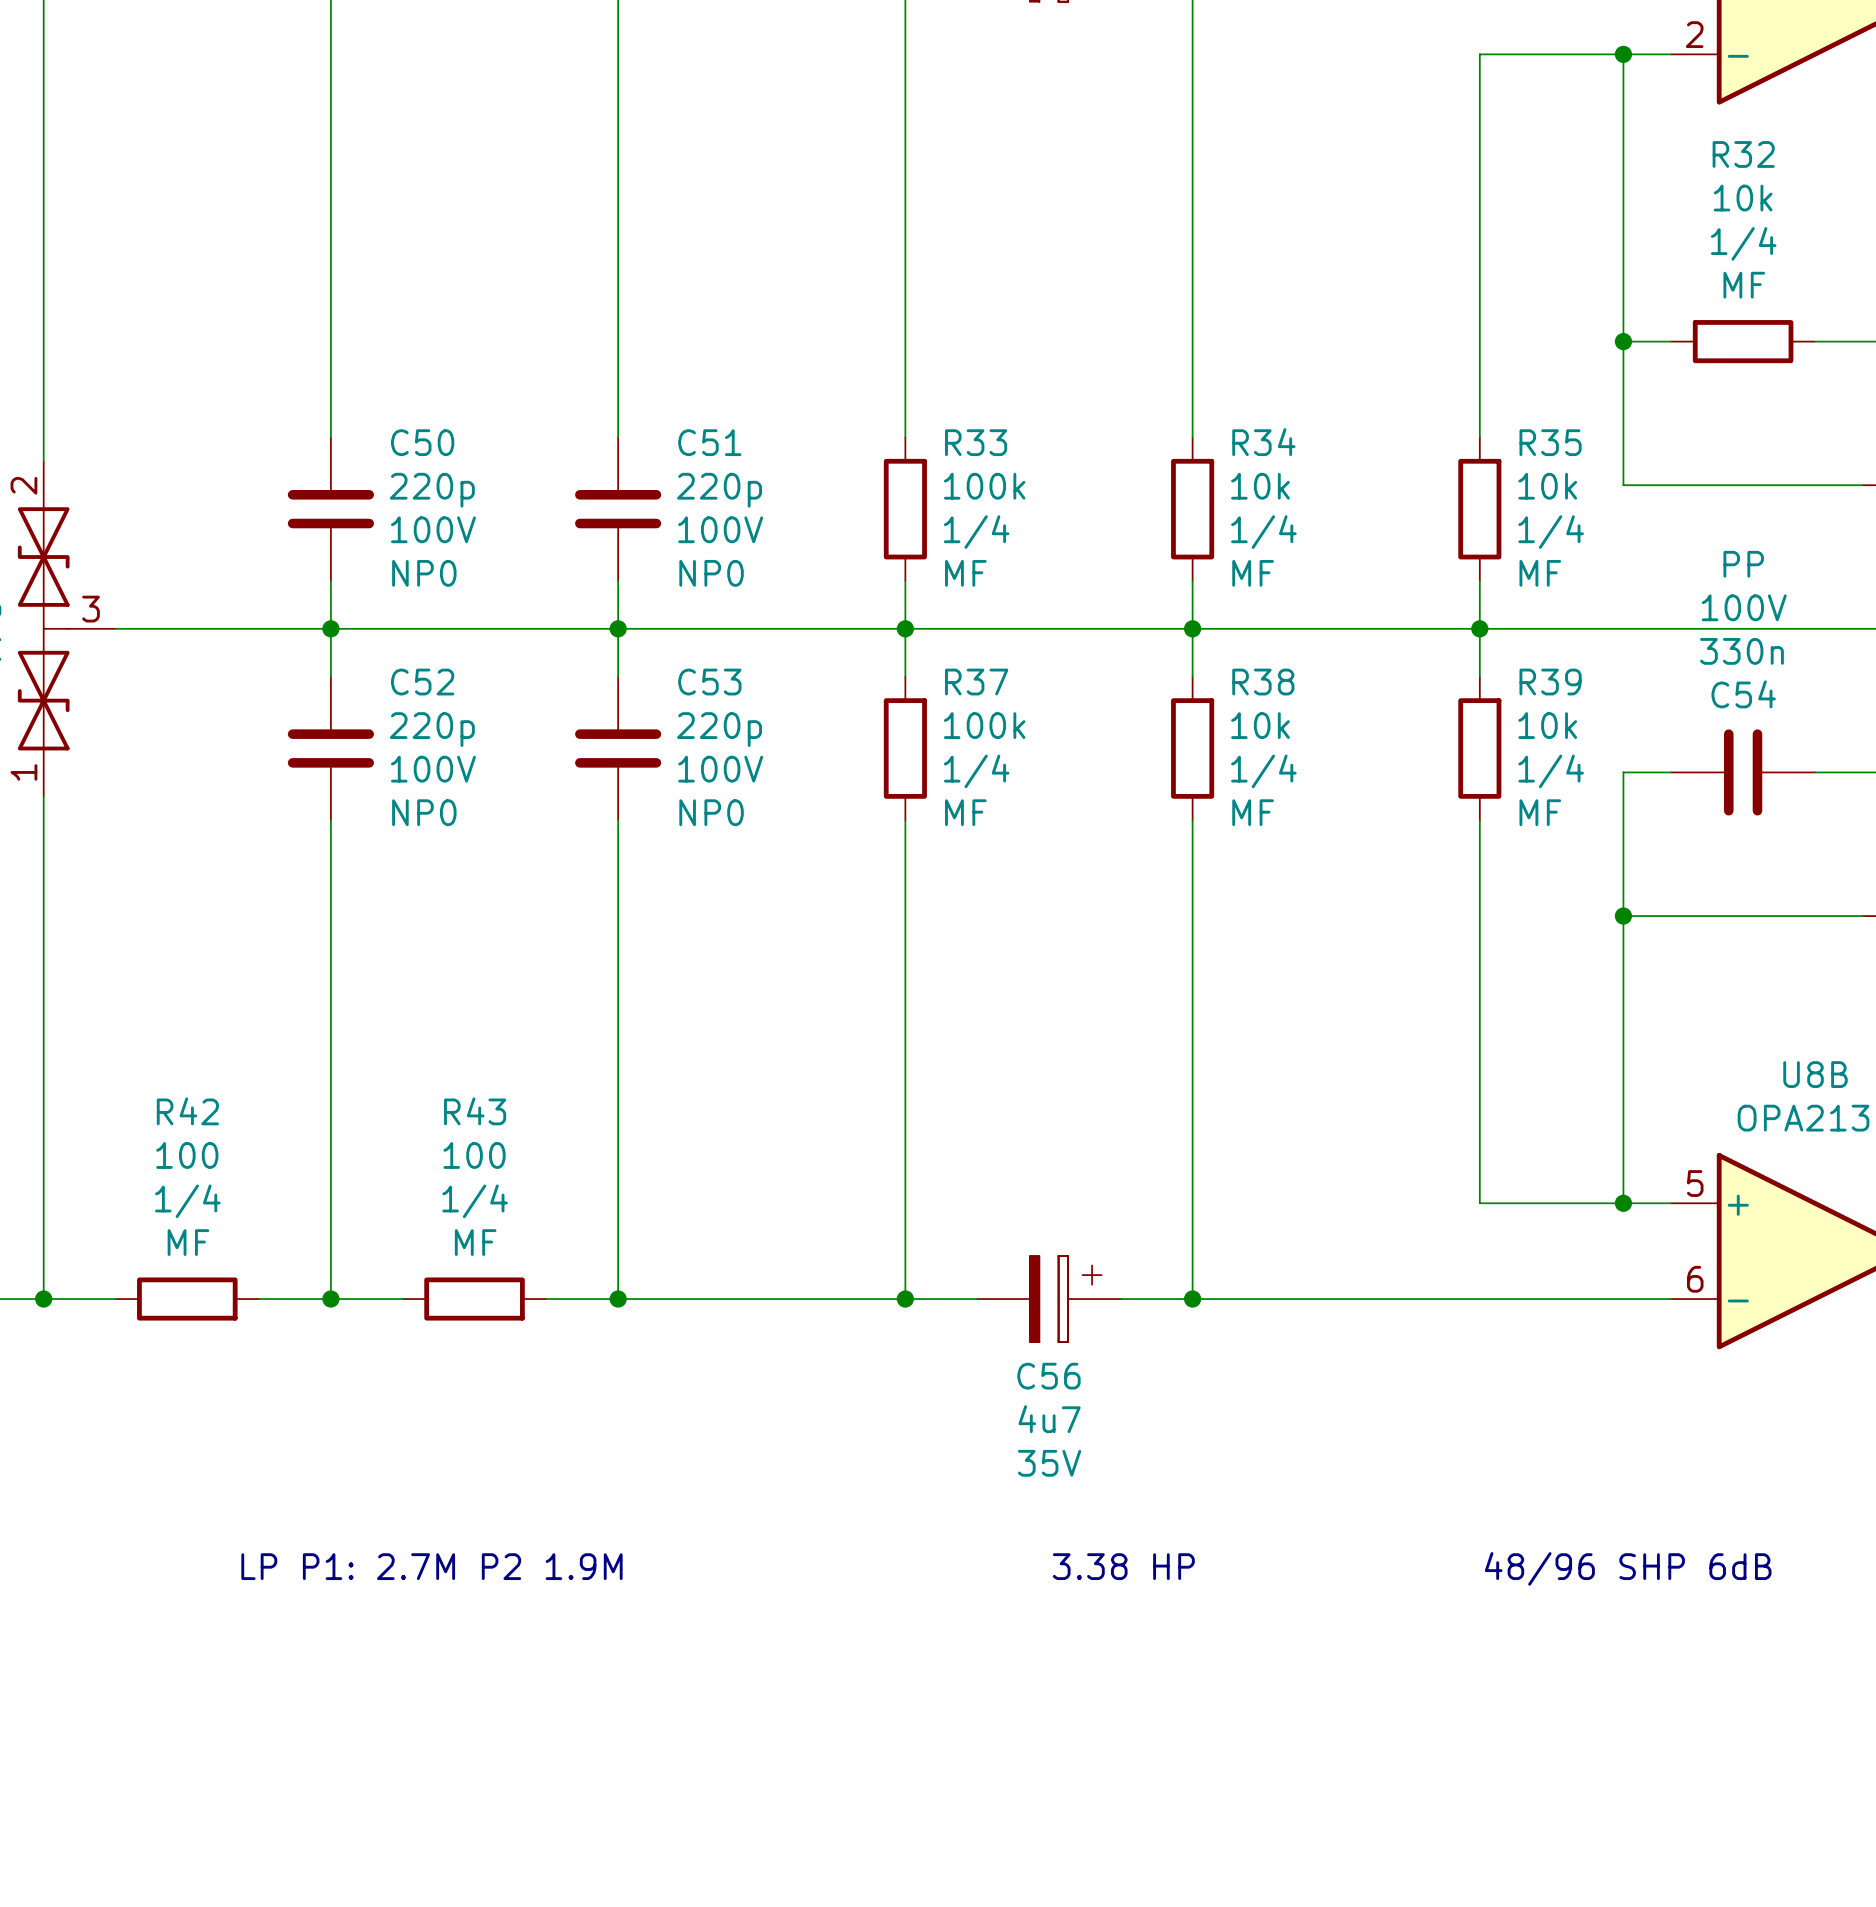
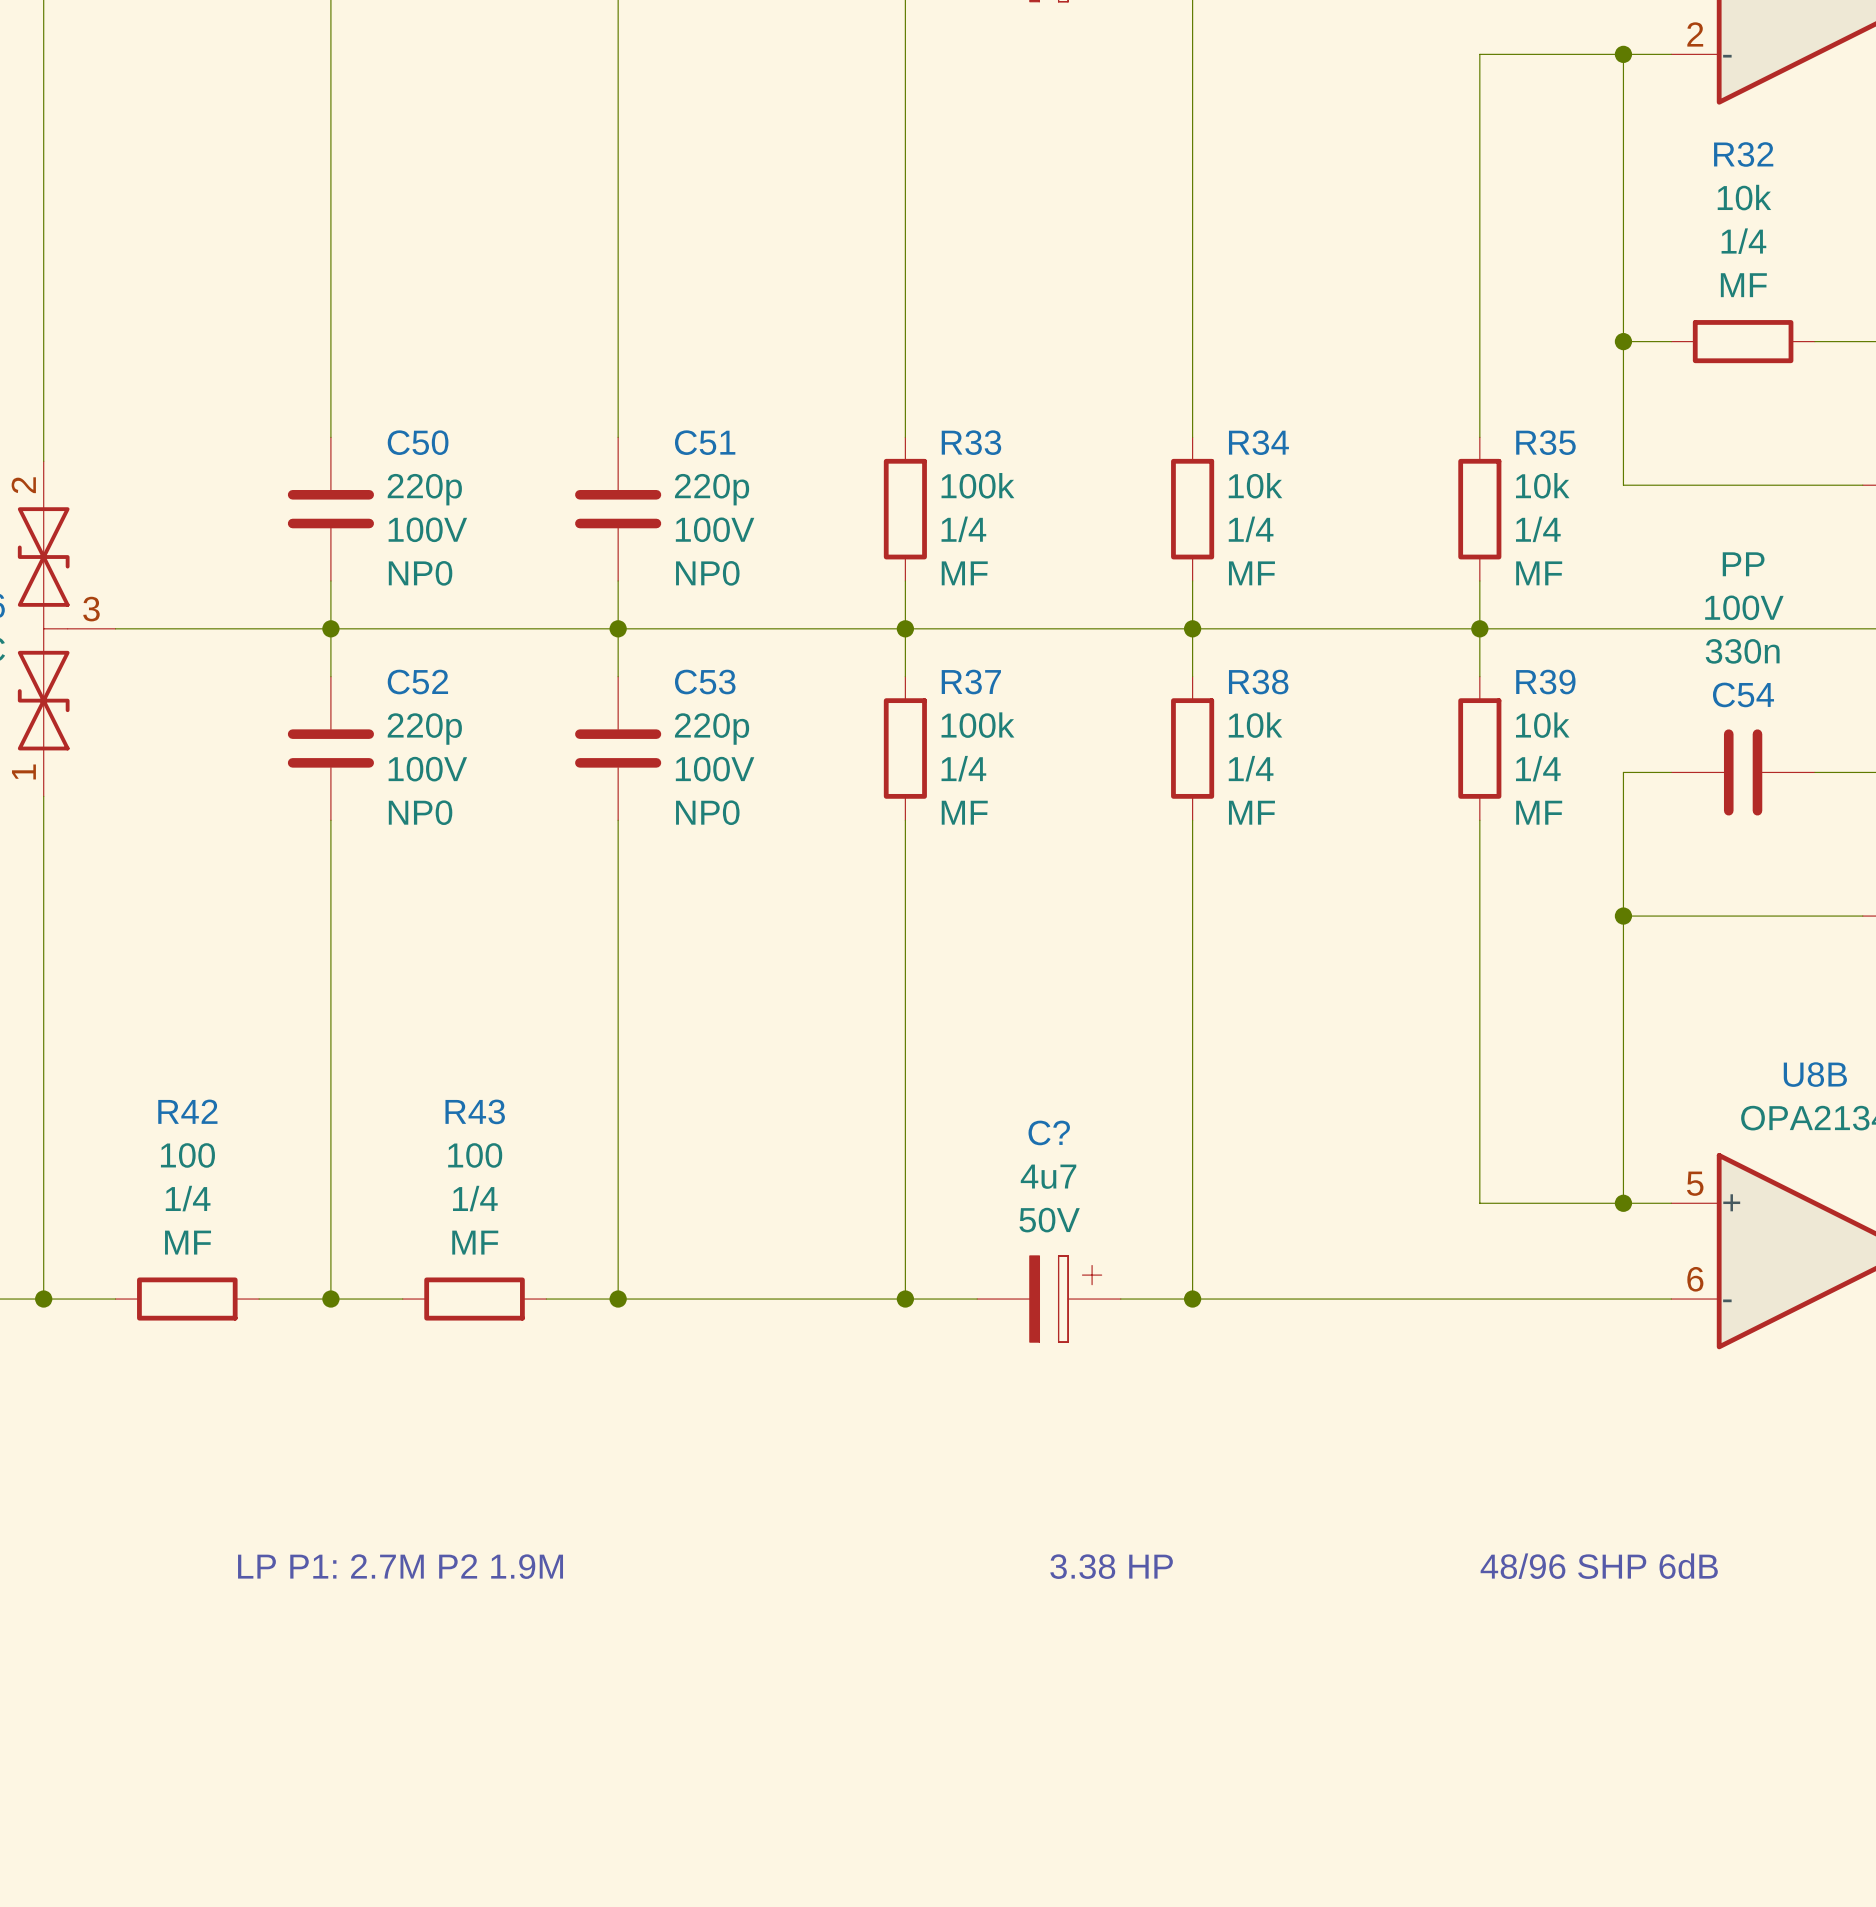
C56 name: C56 (1048, 1376) -> C? (1049, 1132)
C56 value position: 4u7 (1049, 1419) -> 4u7 (1048, 1176)
C56 text: 35V (1049, 1463) -> 50V (1049, 1220)

